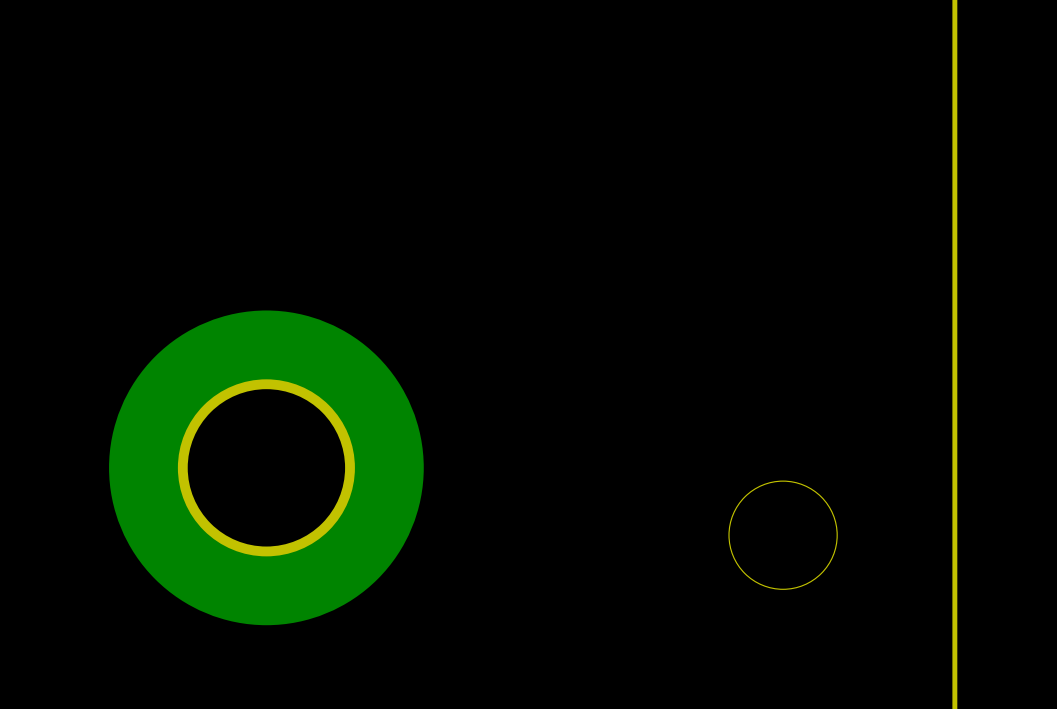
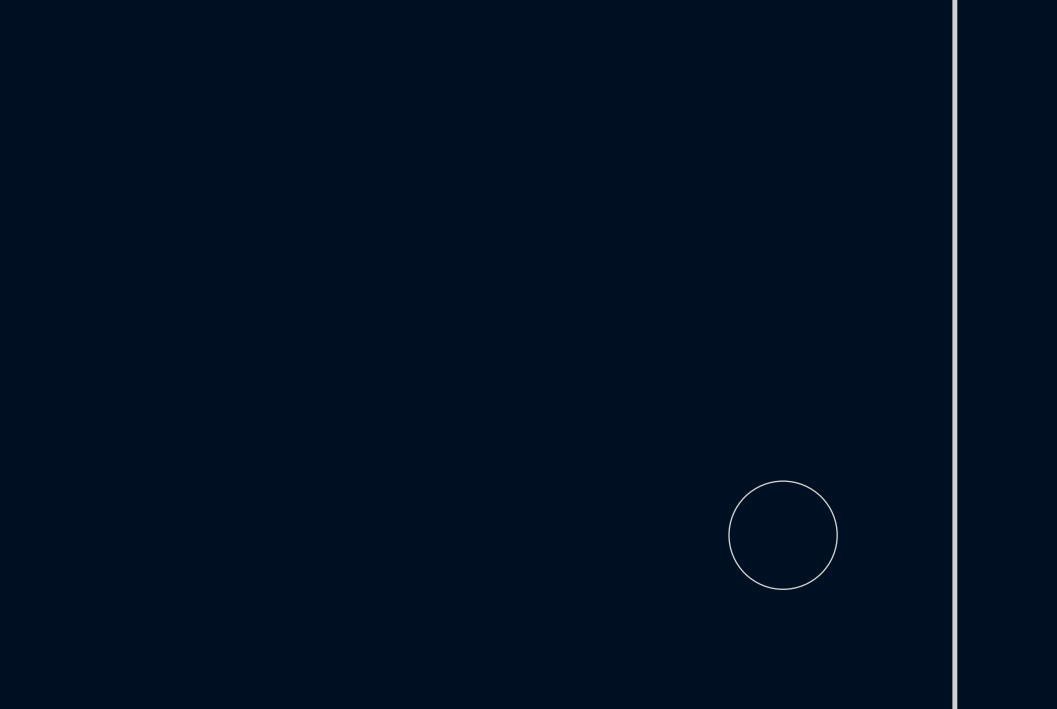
part: (266, 467) -> none

